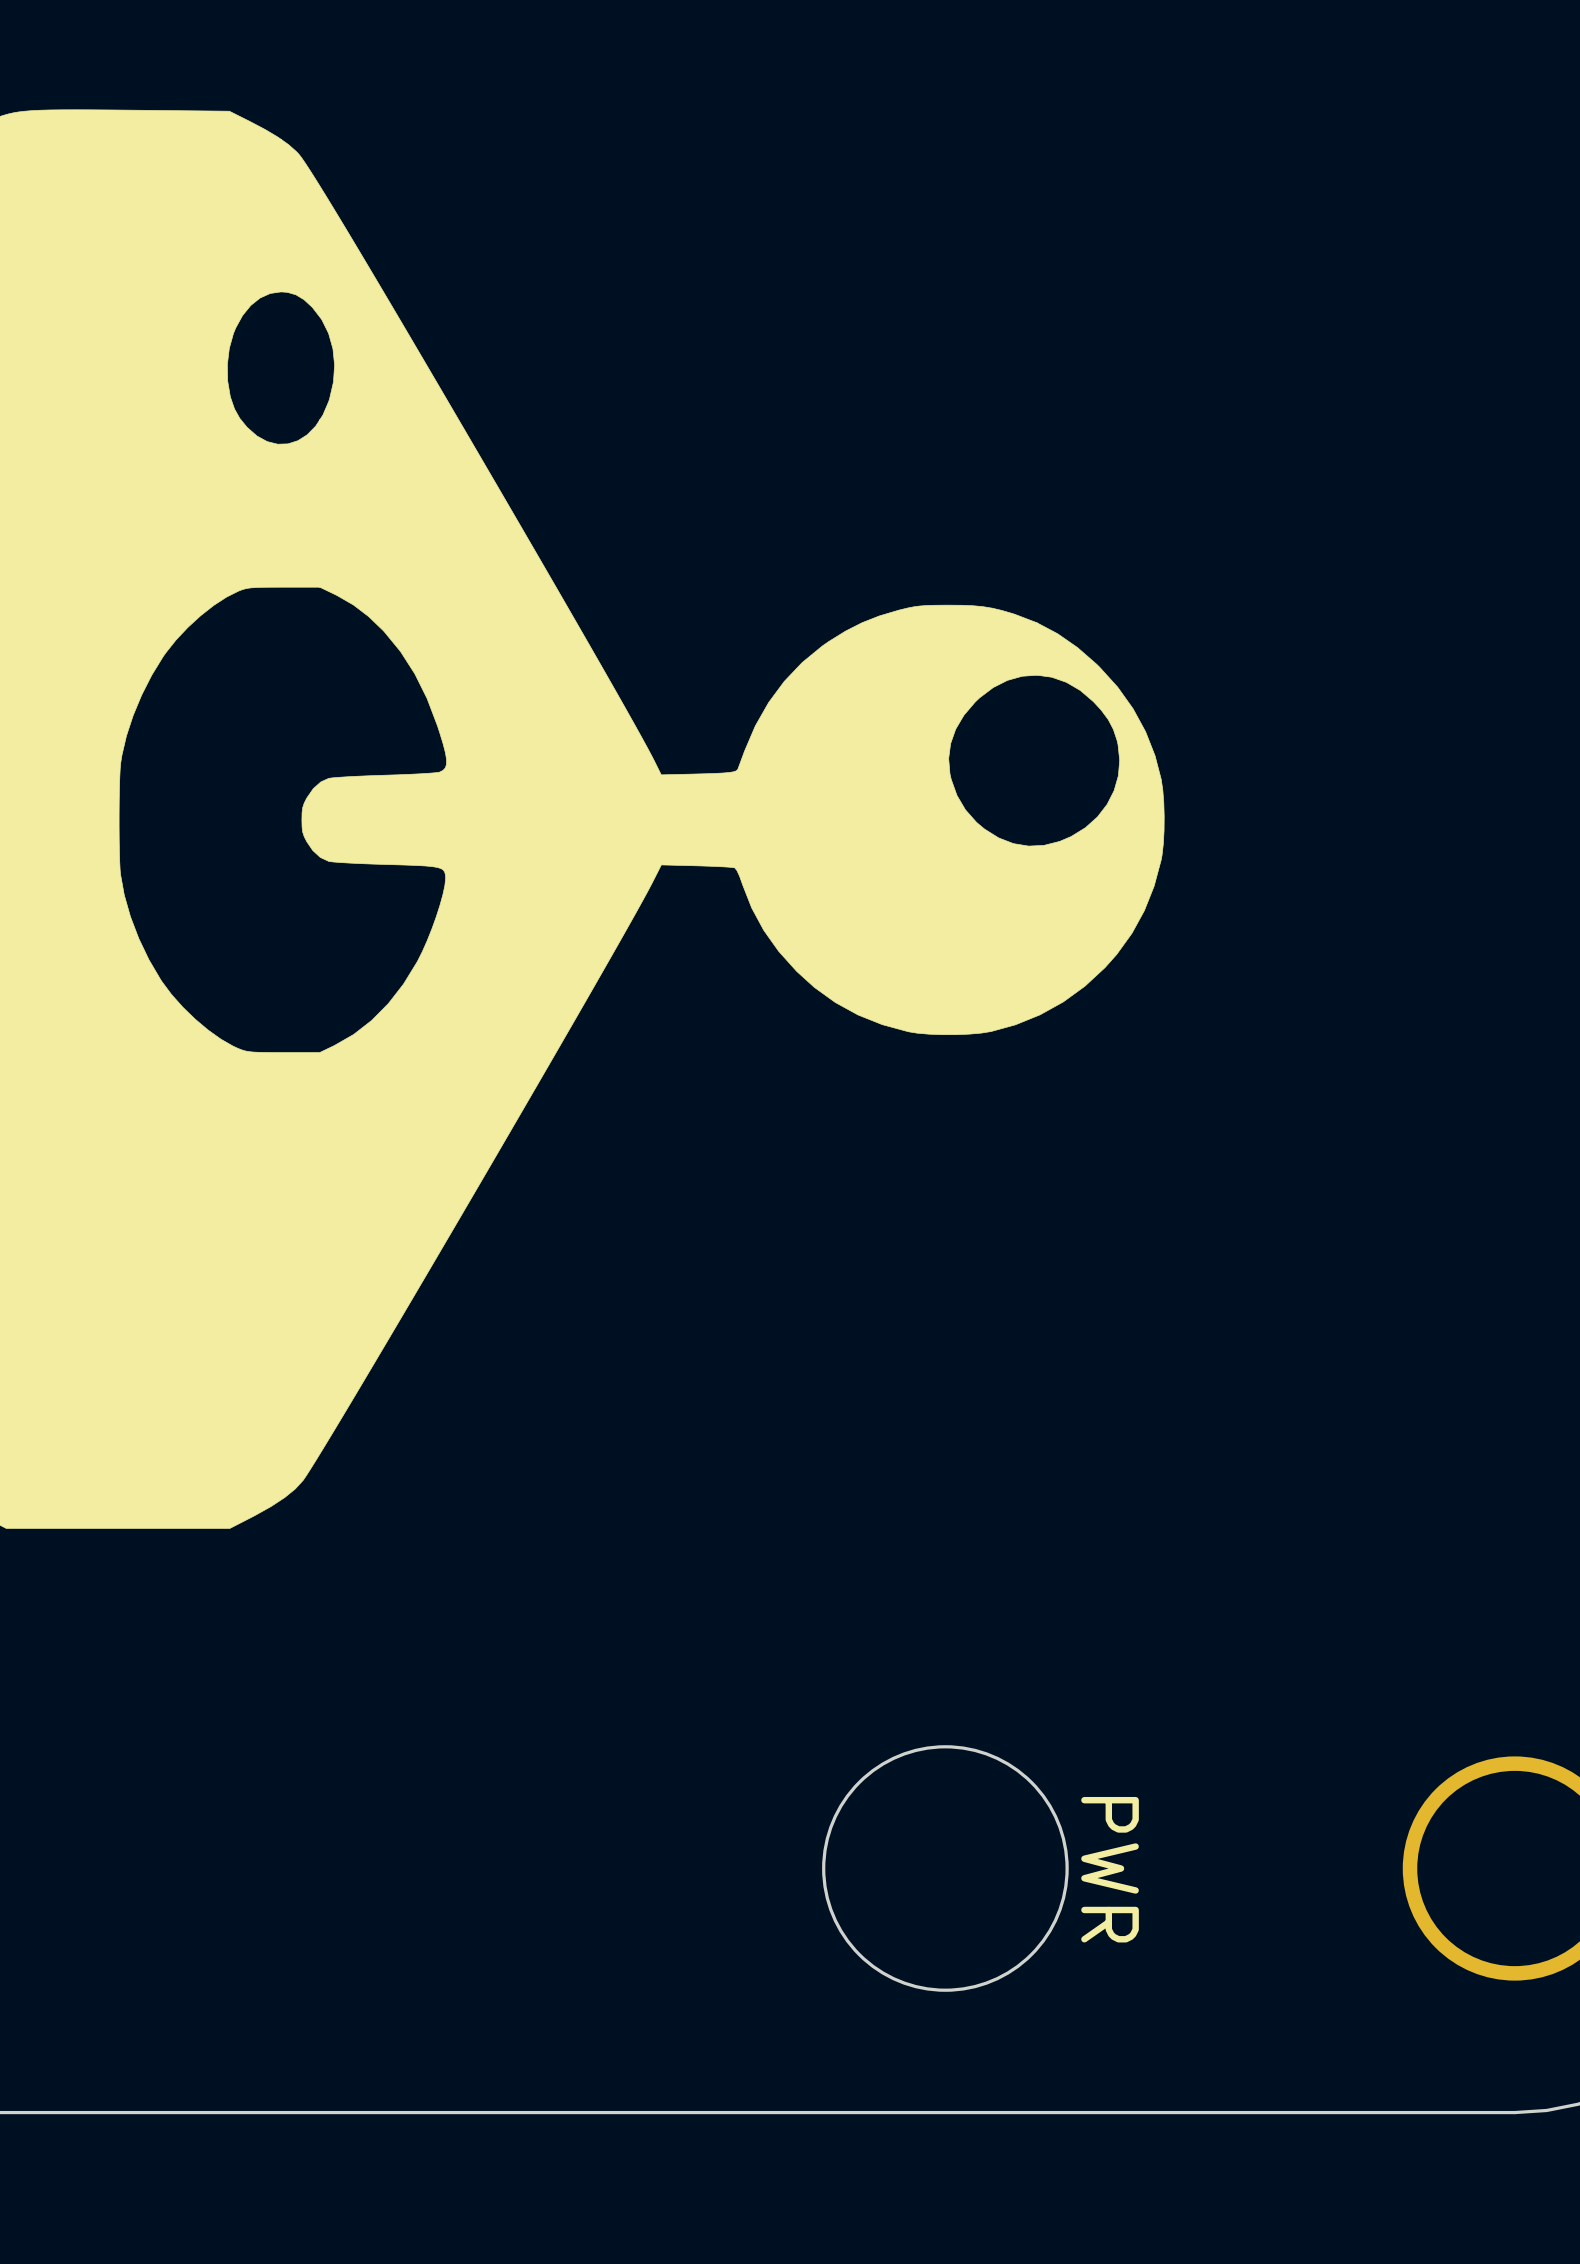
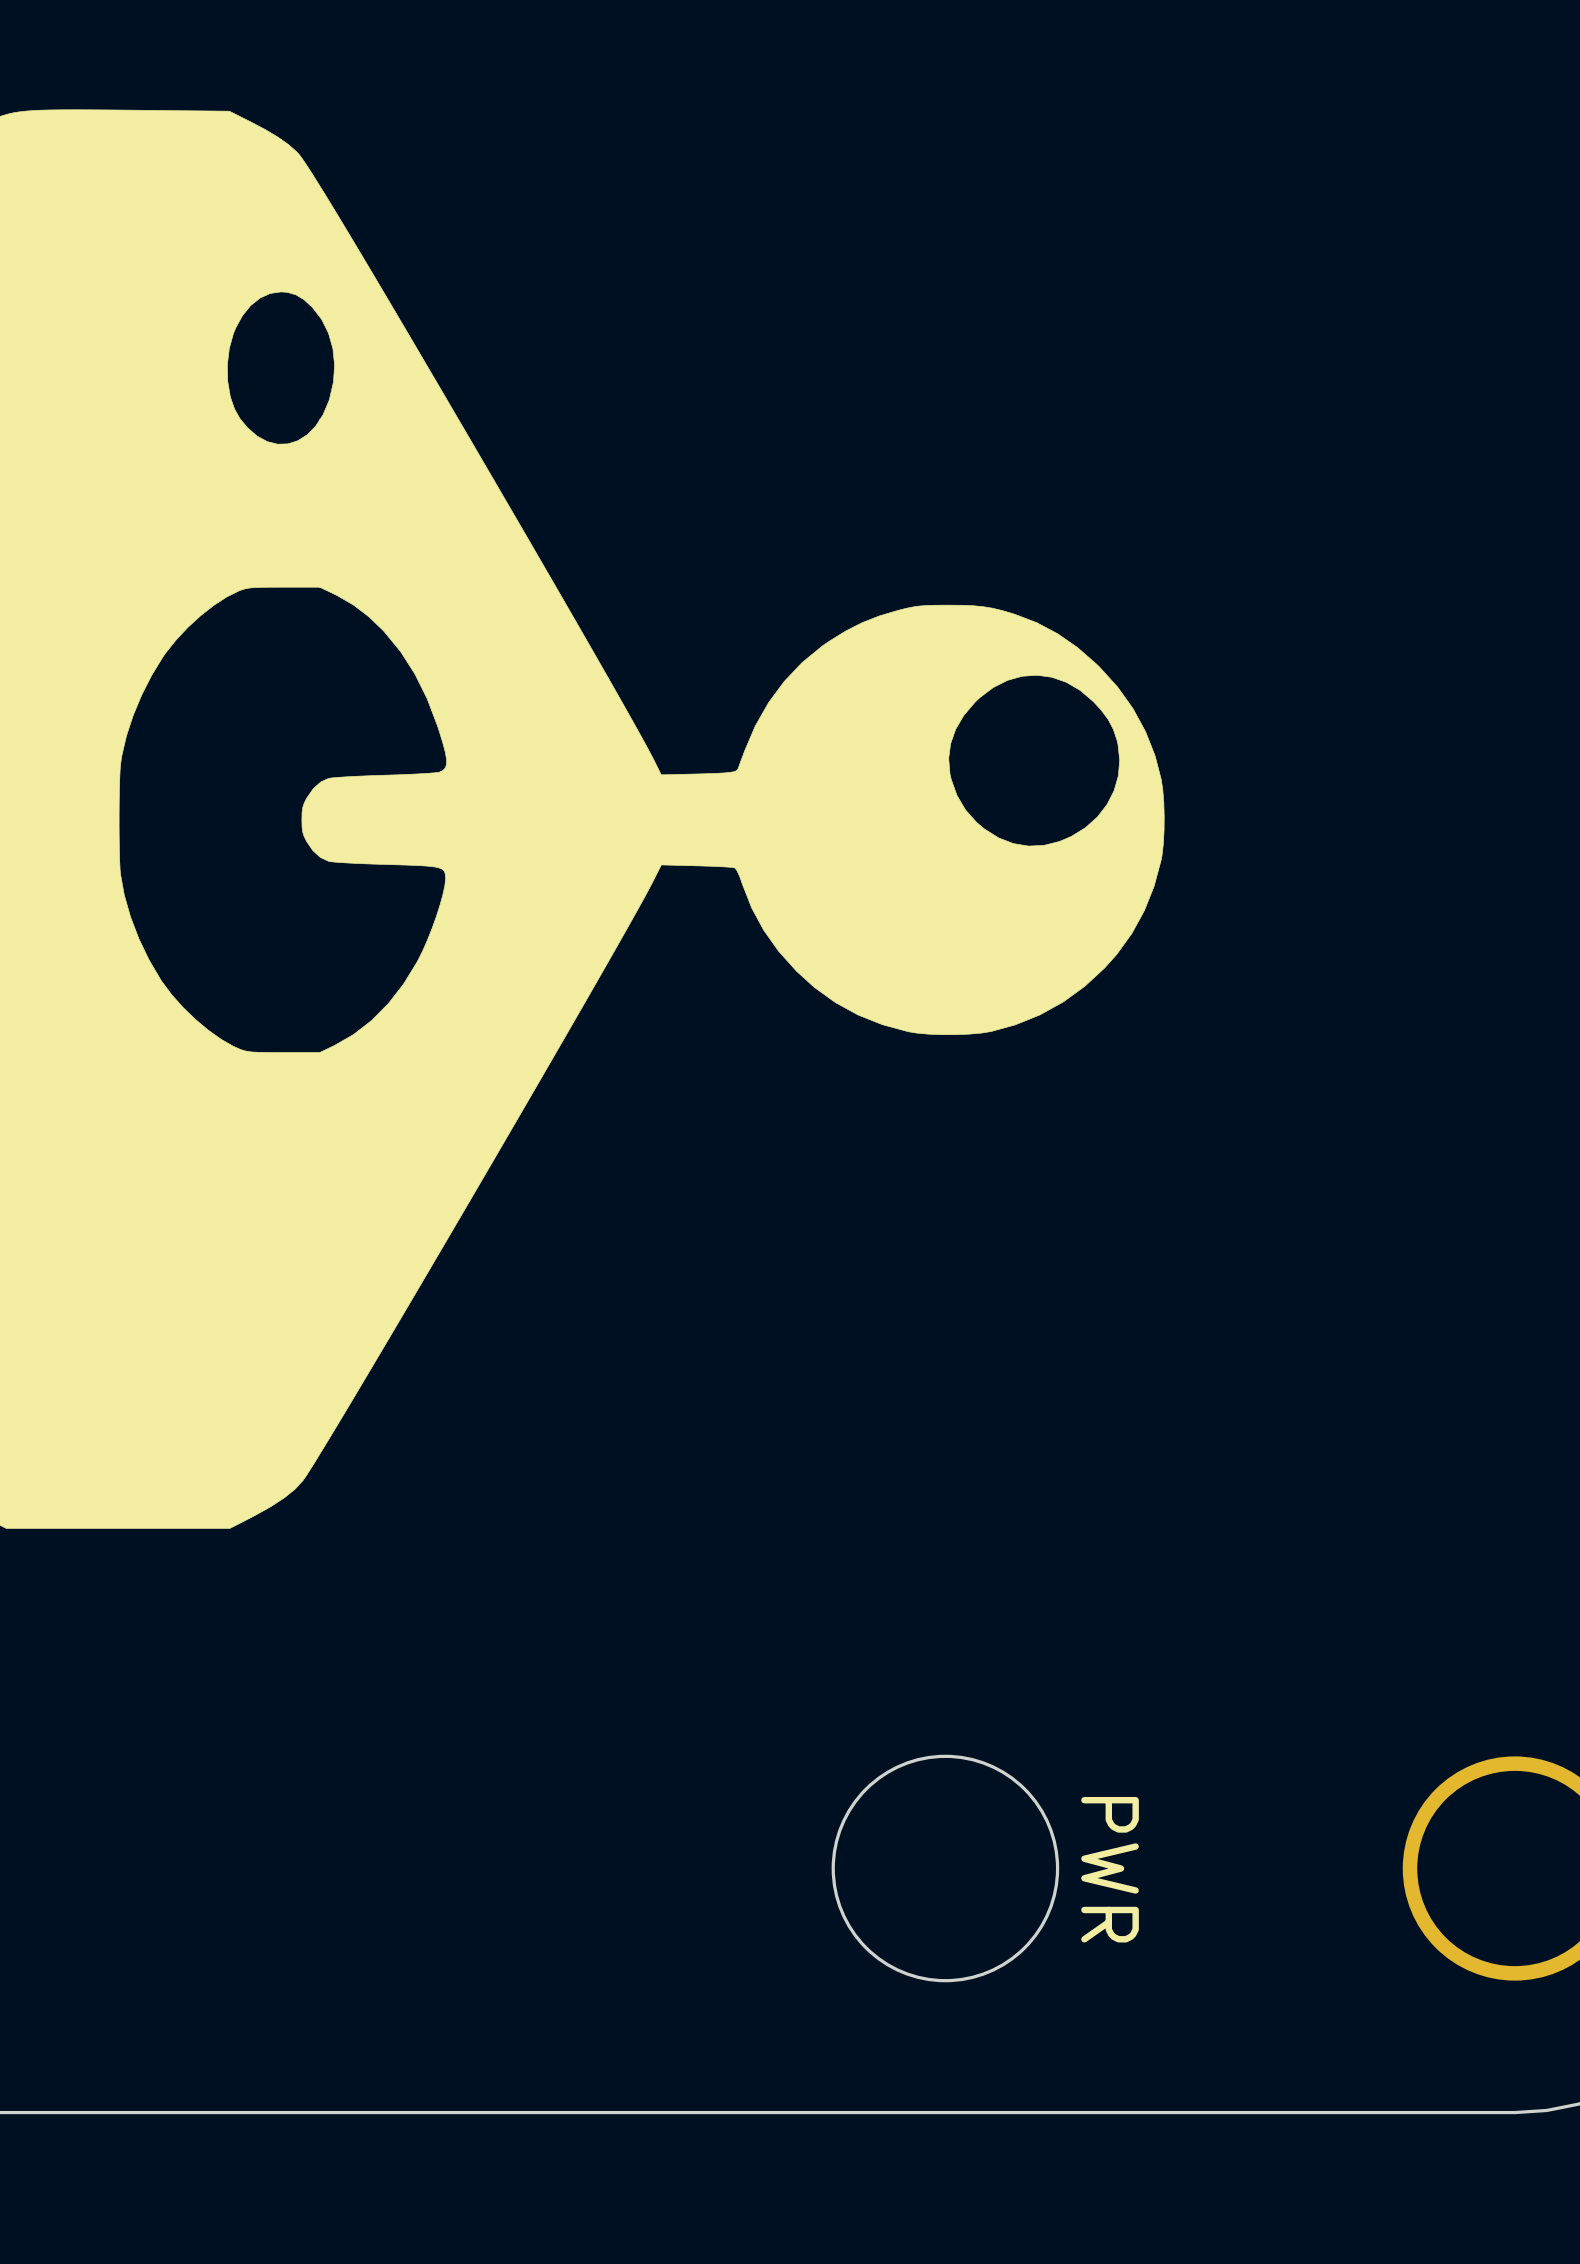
round board edge size: [822, 1745, 1069, 1992] -> [831, 1754, 1060, 1983]

